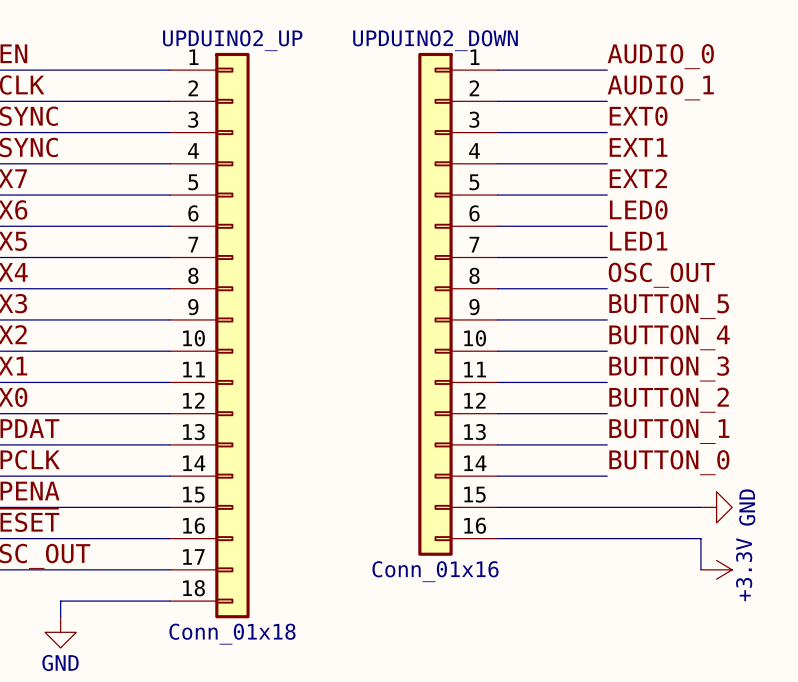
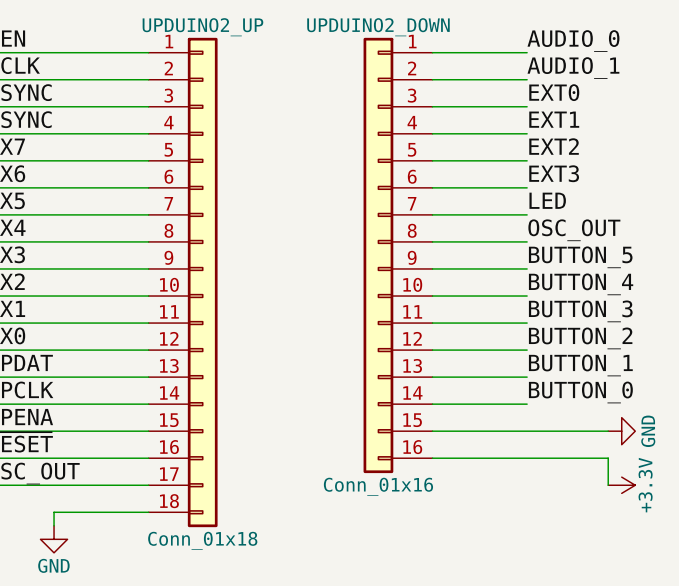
label: LED0 (638, 209) -> EXT3 (554, 173)
label: LED1 (638, 241) -> LED (547, 200)

